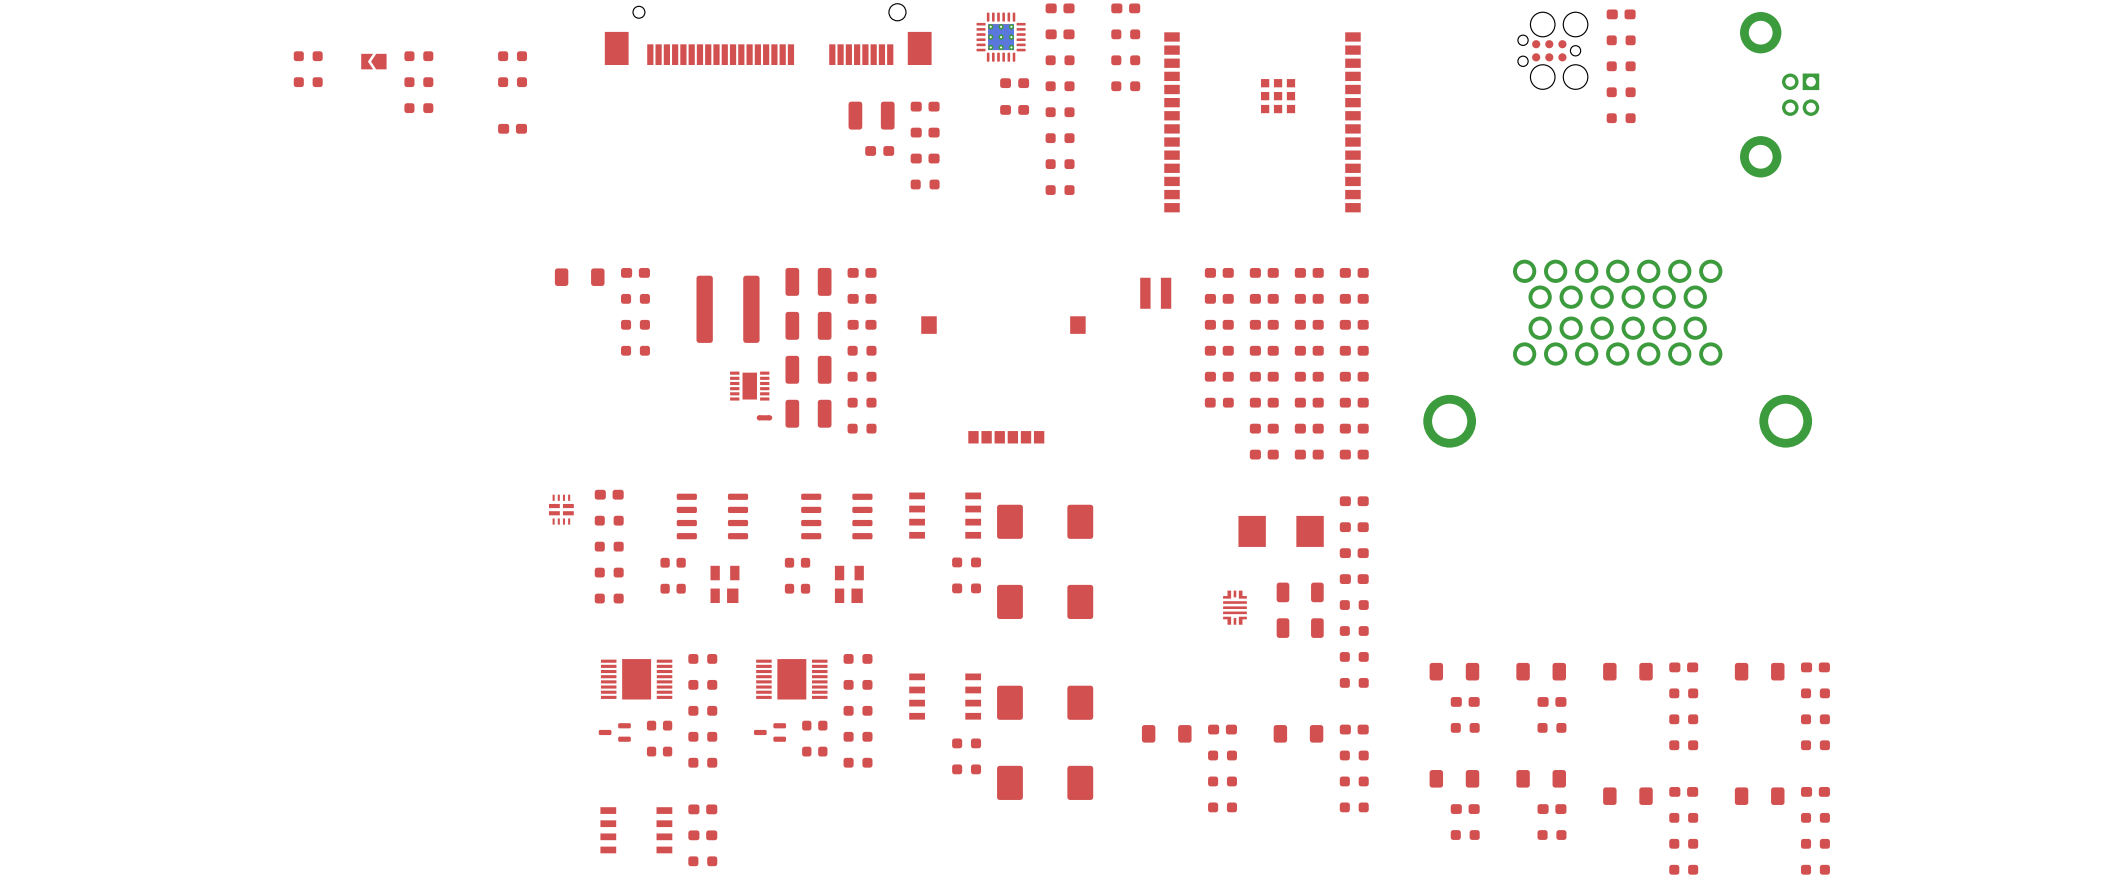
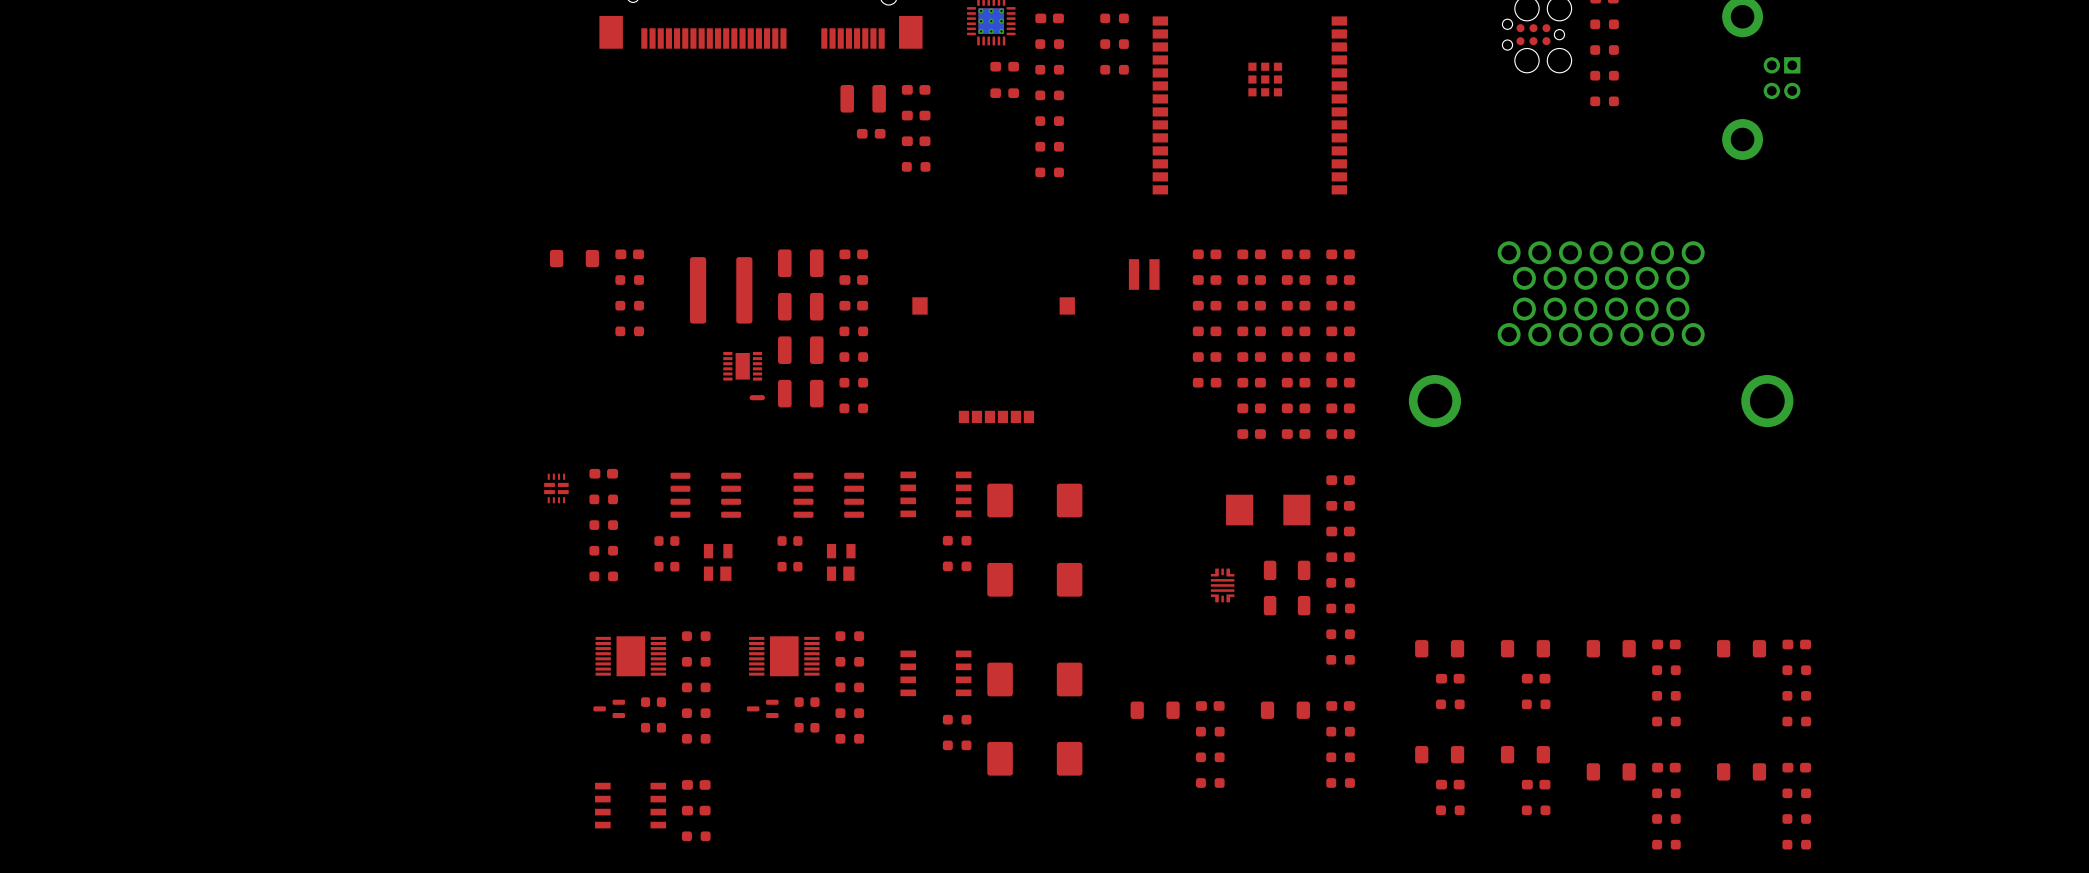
part: (308, 56) -> none
part: (418, 56) -> none
part: (512, 56) -> none
part: (373, 61) -> none
part: (308, 82) -> none
part: (418, 82) -> none
part: (512, 82) -> none
part: (418, 108) -> none
part: (512, 128) -> none

